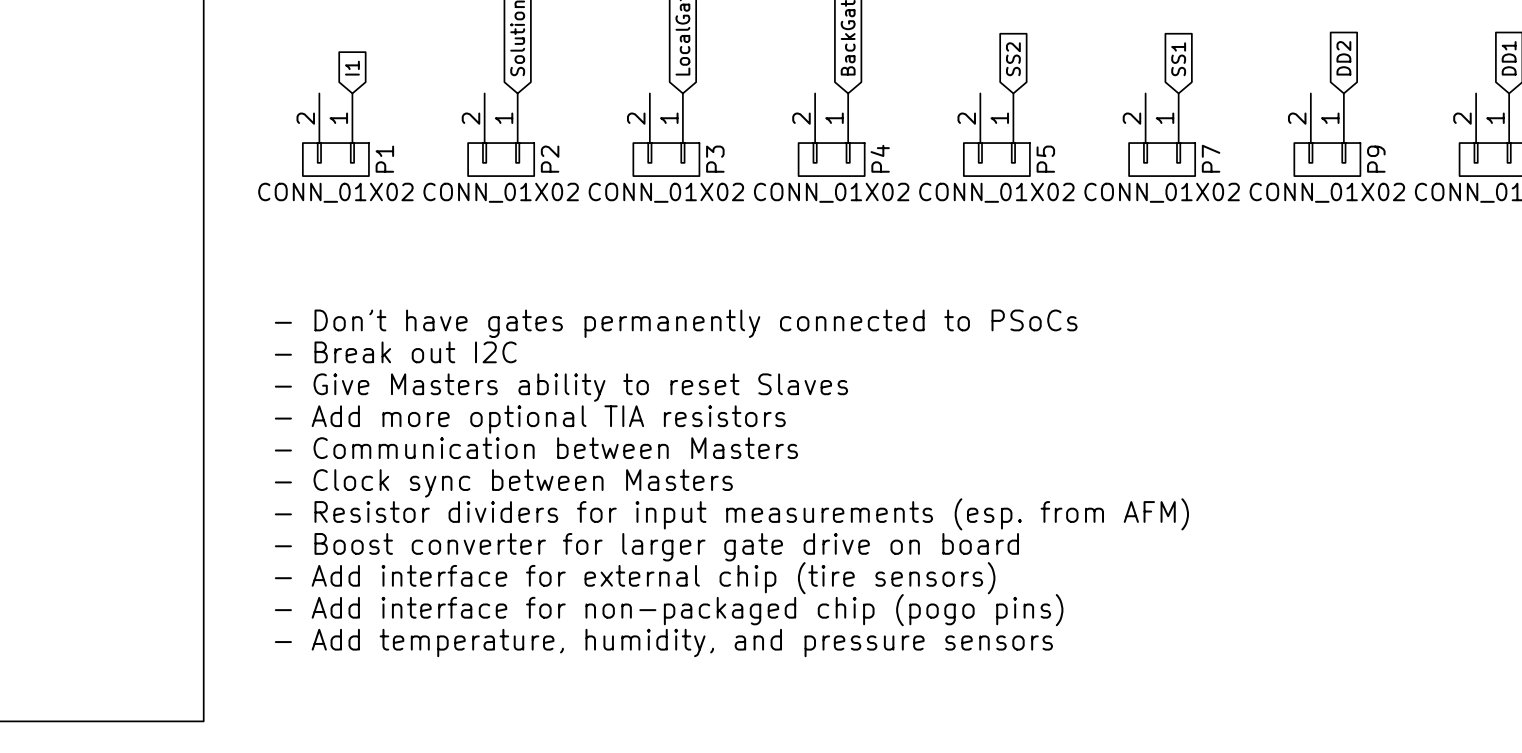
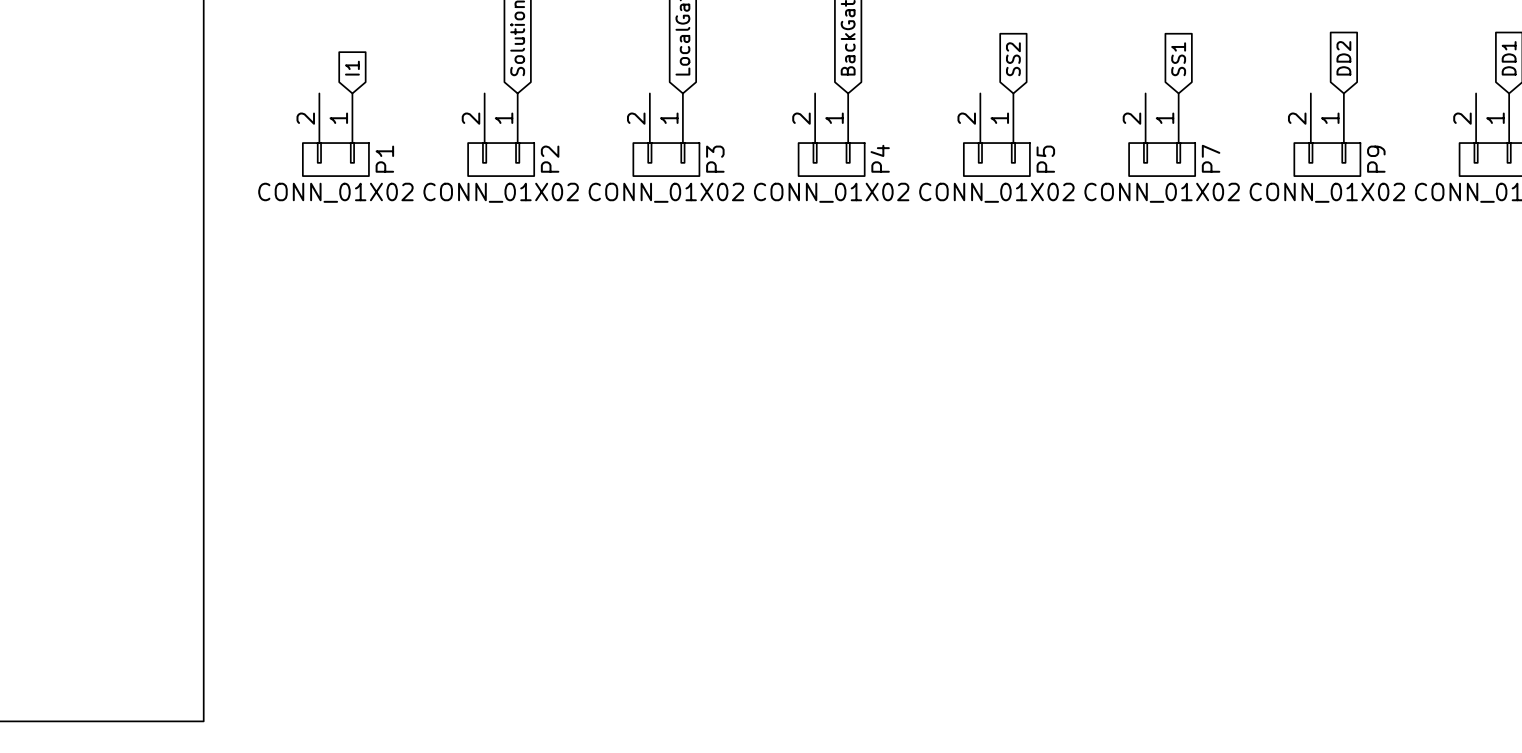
text: - Don’t have gates permanently connected to PSoCs (676, 323) -> none
text: - Break out I2C (395, 352) -> none
text: - Give Masters ability to reset Slaves (561, 387) -> none
text: - Add more optional TIA resistors (530, 419) -> none
text: - Communication between Masters (536, 448) -> none
text: - Clock sync between Masters (503, 483) -> none
text: - Resistor dividers for input measurements (esp. from AFM) (731, 514) -> none
text: - Boost converter for larger gate drive on board (646, 547) -> none
text: - Add interface for external chip (tire sensors) (635, 578) -> none
text: - Add interface for non-packaged chip (pogo pins) (669, 610) -> none
text: - Add temperature, humidity, and pressure sensors (663, 643) -> none

